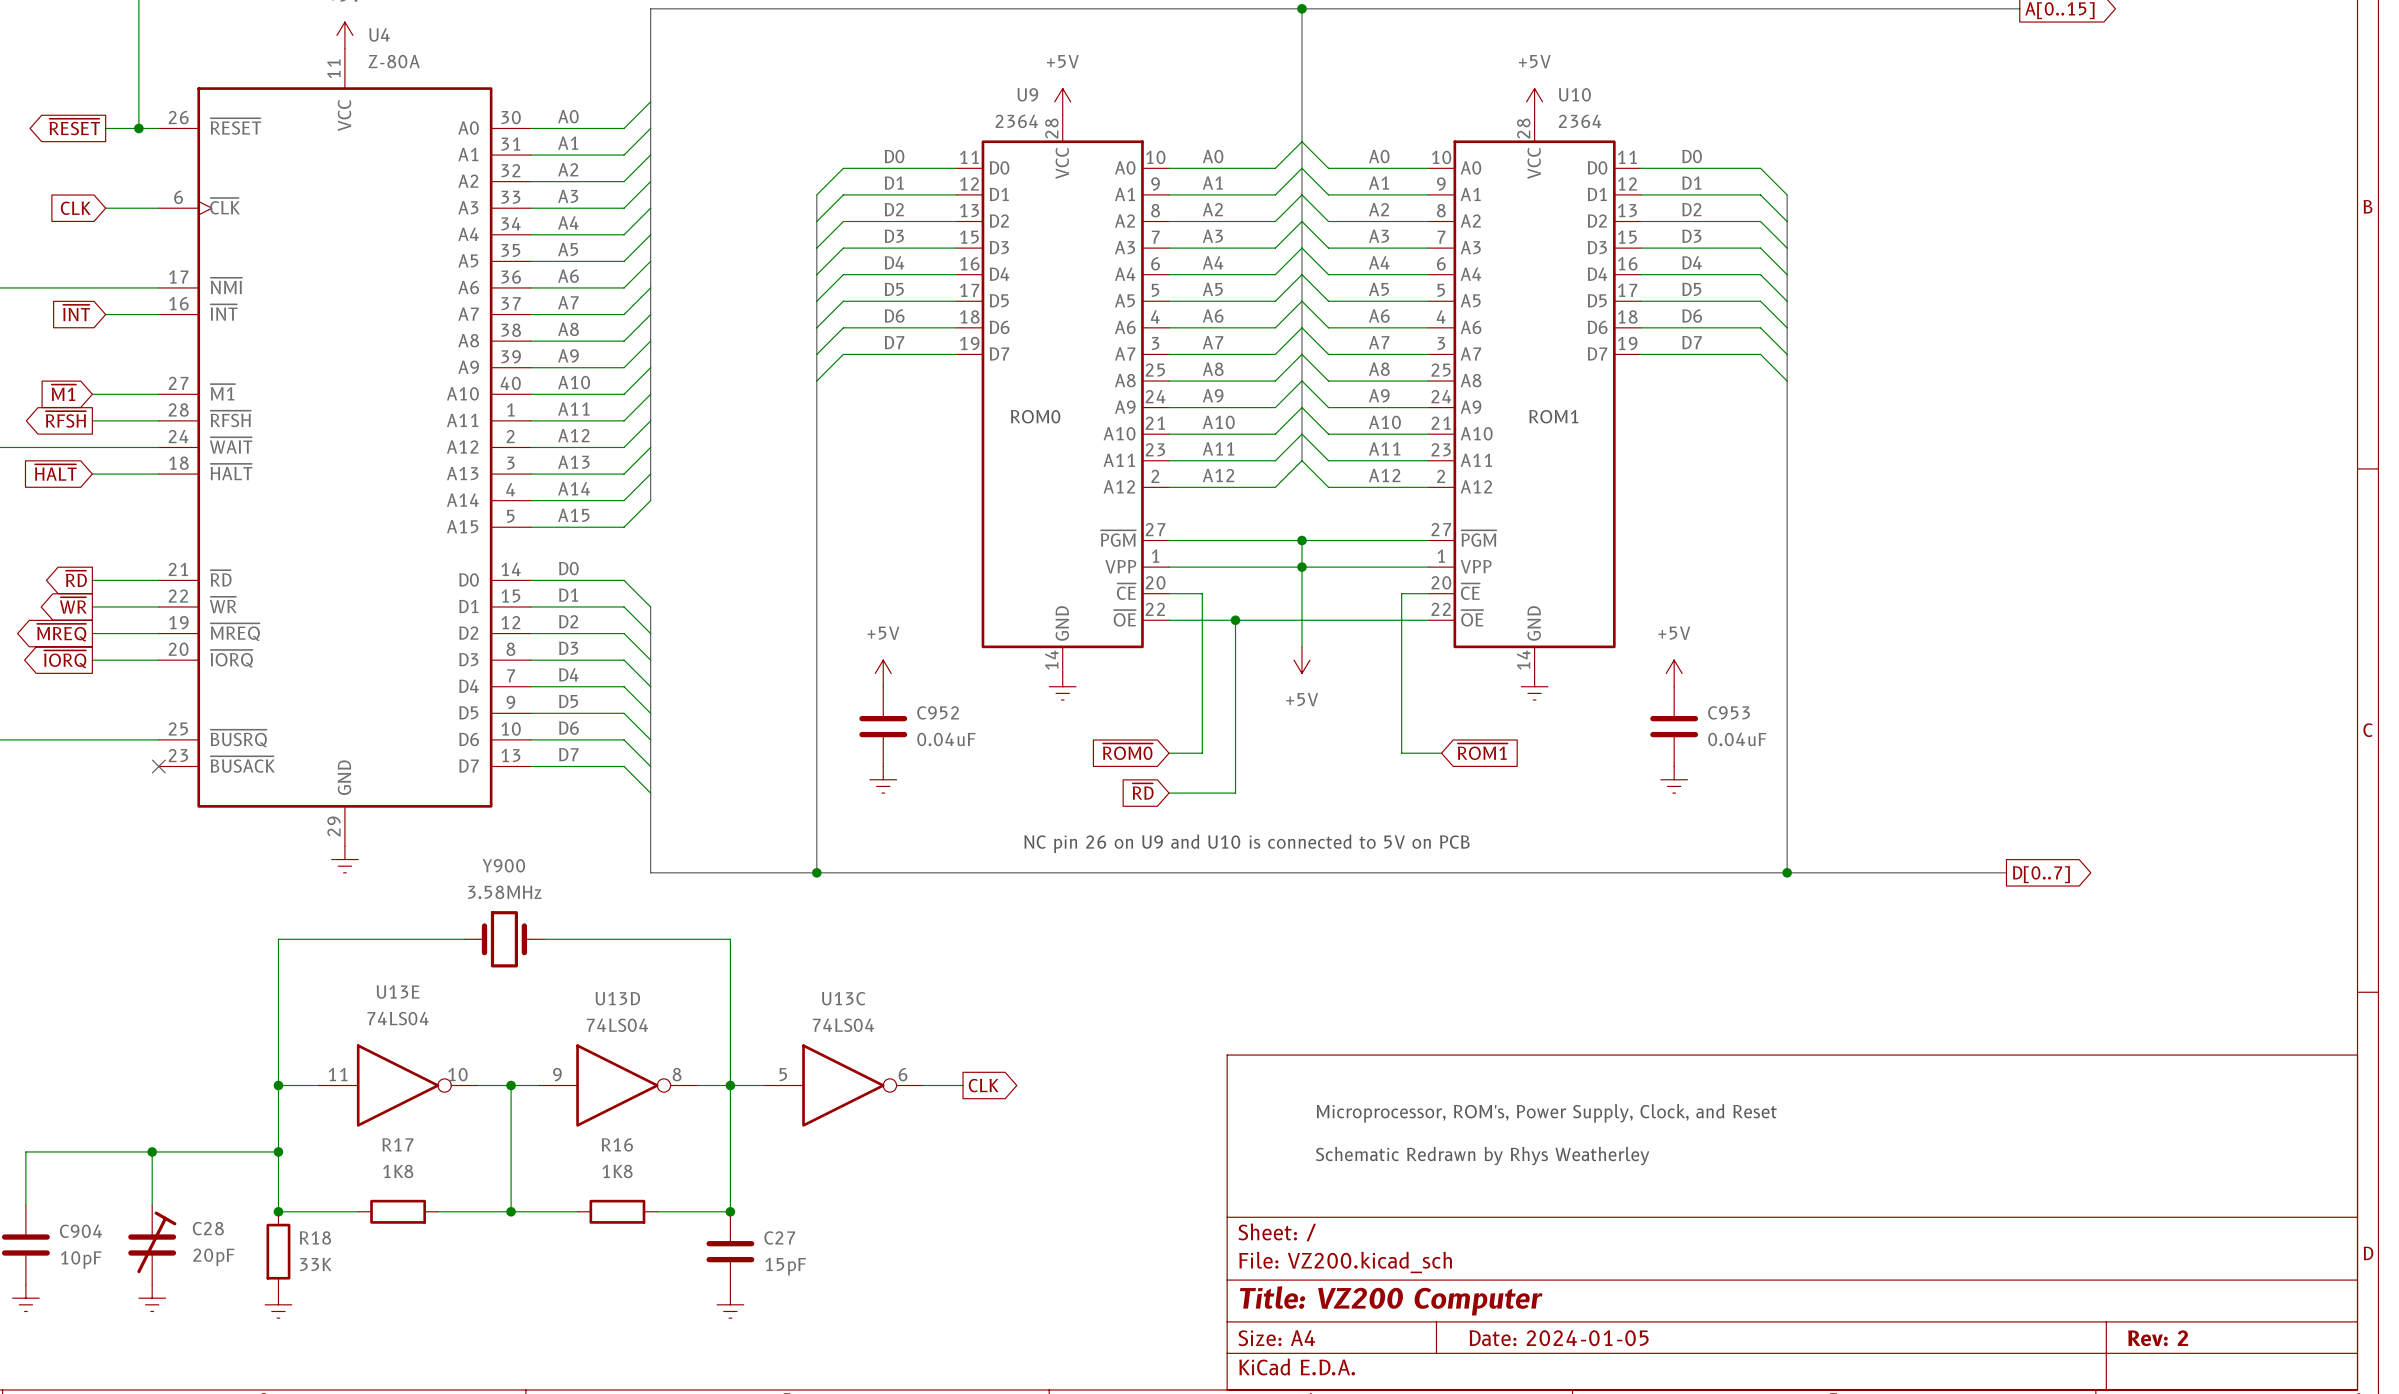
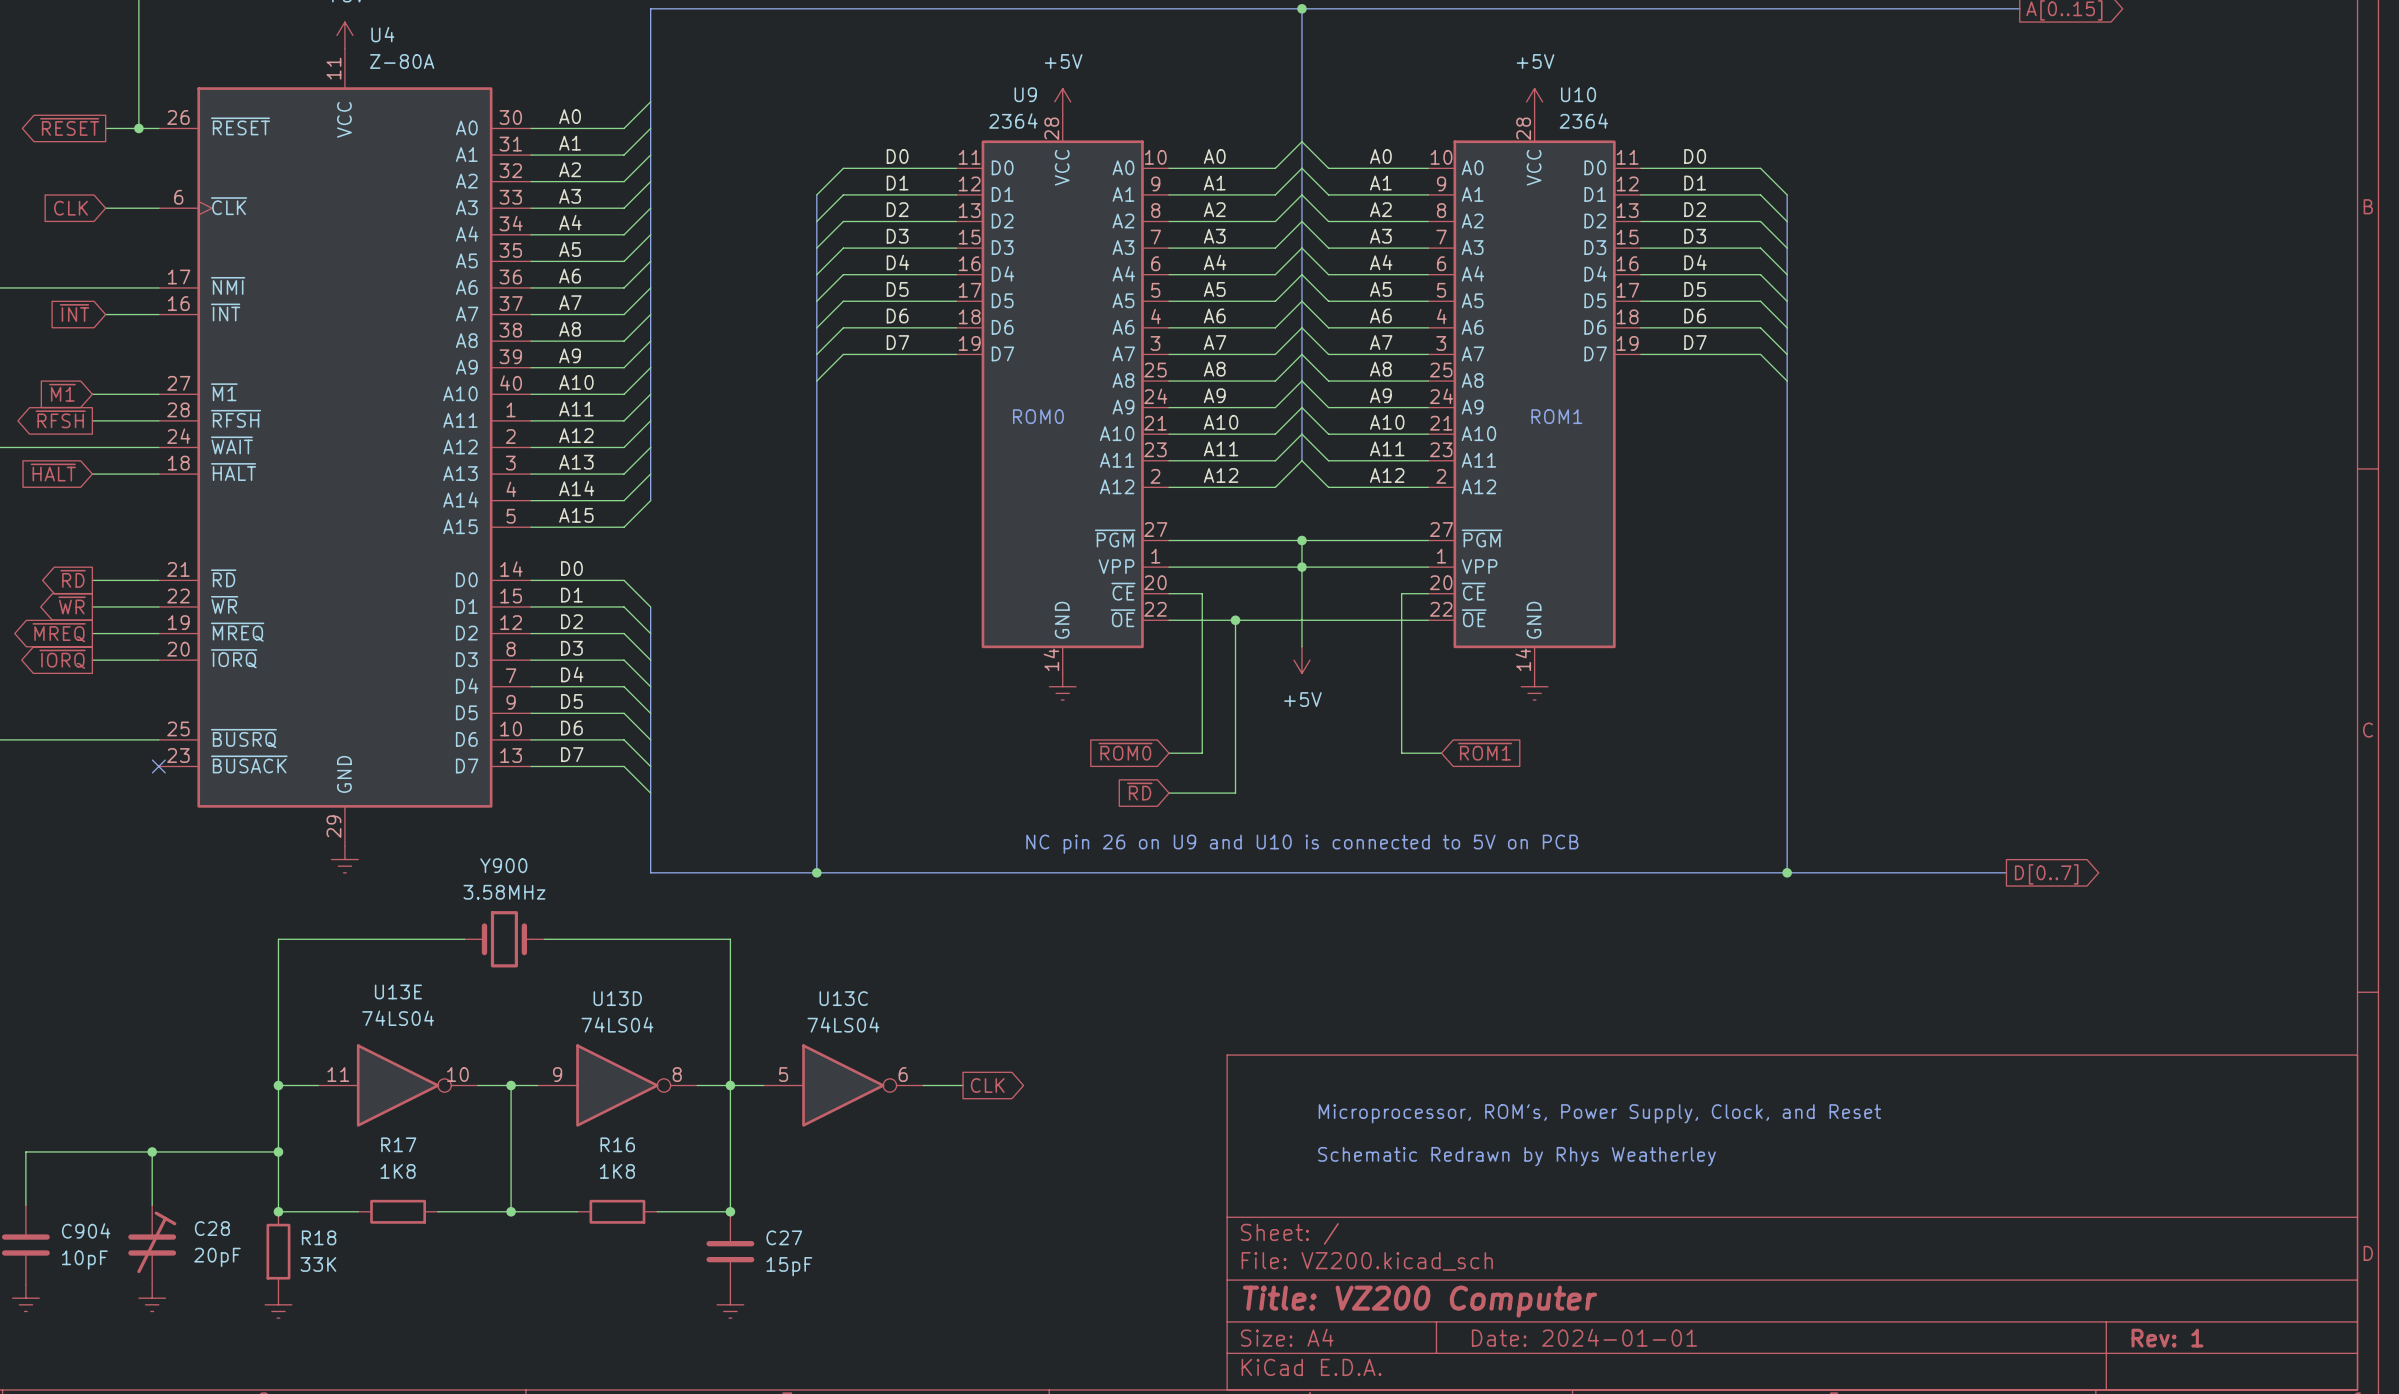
power symbol: +5V (883, 673) -> none
power symbol: +5V (1674, 673) -> none
C952: 0.04uF (883, 726) -> none
C953: 0.04uF (1674, 726) -> none
power symbol: (883, 779) -> none
power symbol: (1674, 779) -> none
title block: Date: 2024-01-05 (1559, 1338) -> Date: 2024-01-01 (1584, 1337)
title block: Rev: 2 (2158, 1338) -> Rev: 1 (2167, 1338)

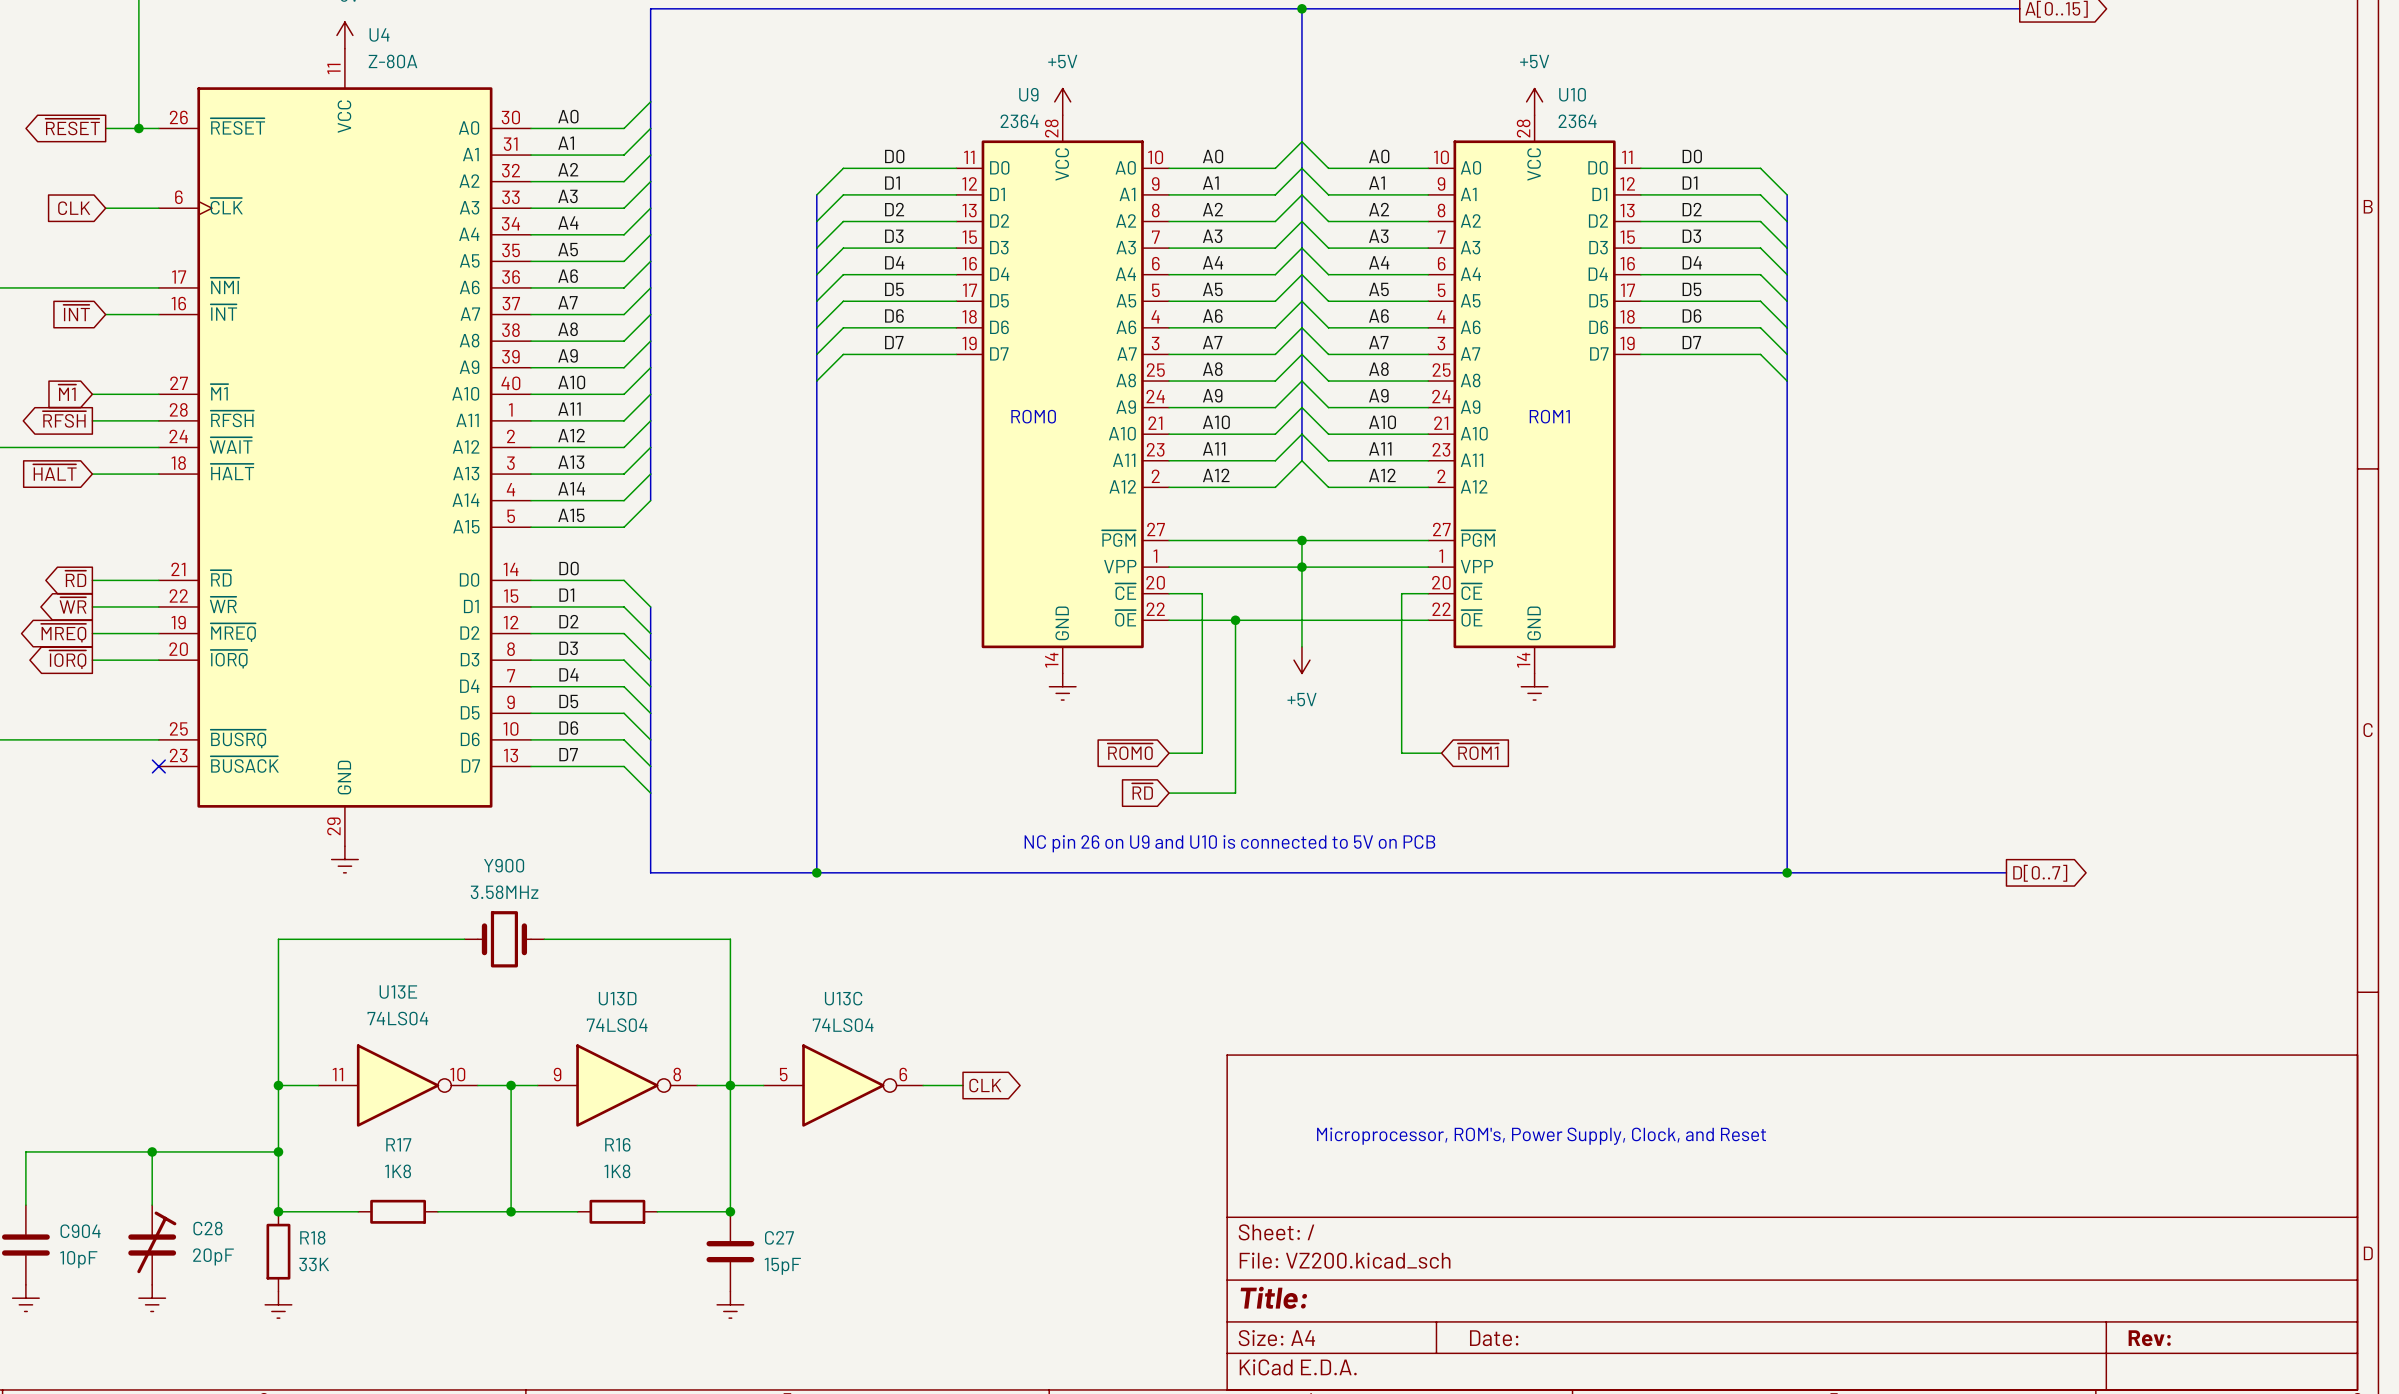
text position: Microprocessor, ROM's, Power Supply, Clock, and Reset (1599, 1113) -> Microprocessor, ROM's, Power Supply, Clock, and Reset (1541, 1136)
text: Schematic Redrawn by Rhys Weatherley (1516, 1156) -> none
title block: Title: VZ200 Computer (1419, 1301) -> Title: (1273, 1297)
title block: Date: 2024-01-01 (1584, 1337) -> Date: (1494, 1338)
title block: Rev: 1 (2167, 1338) -> Rev: (2149, 1338)

